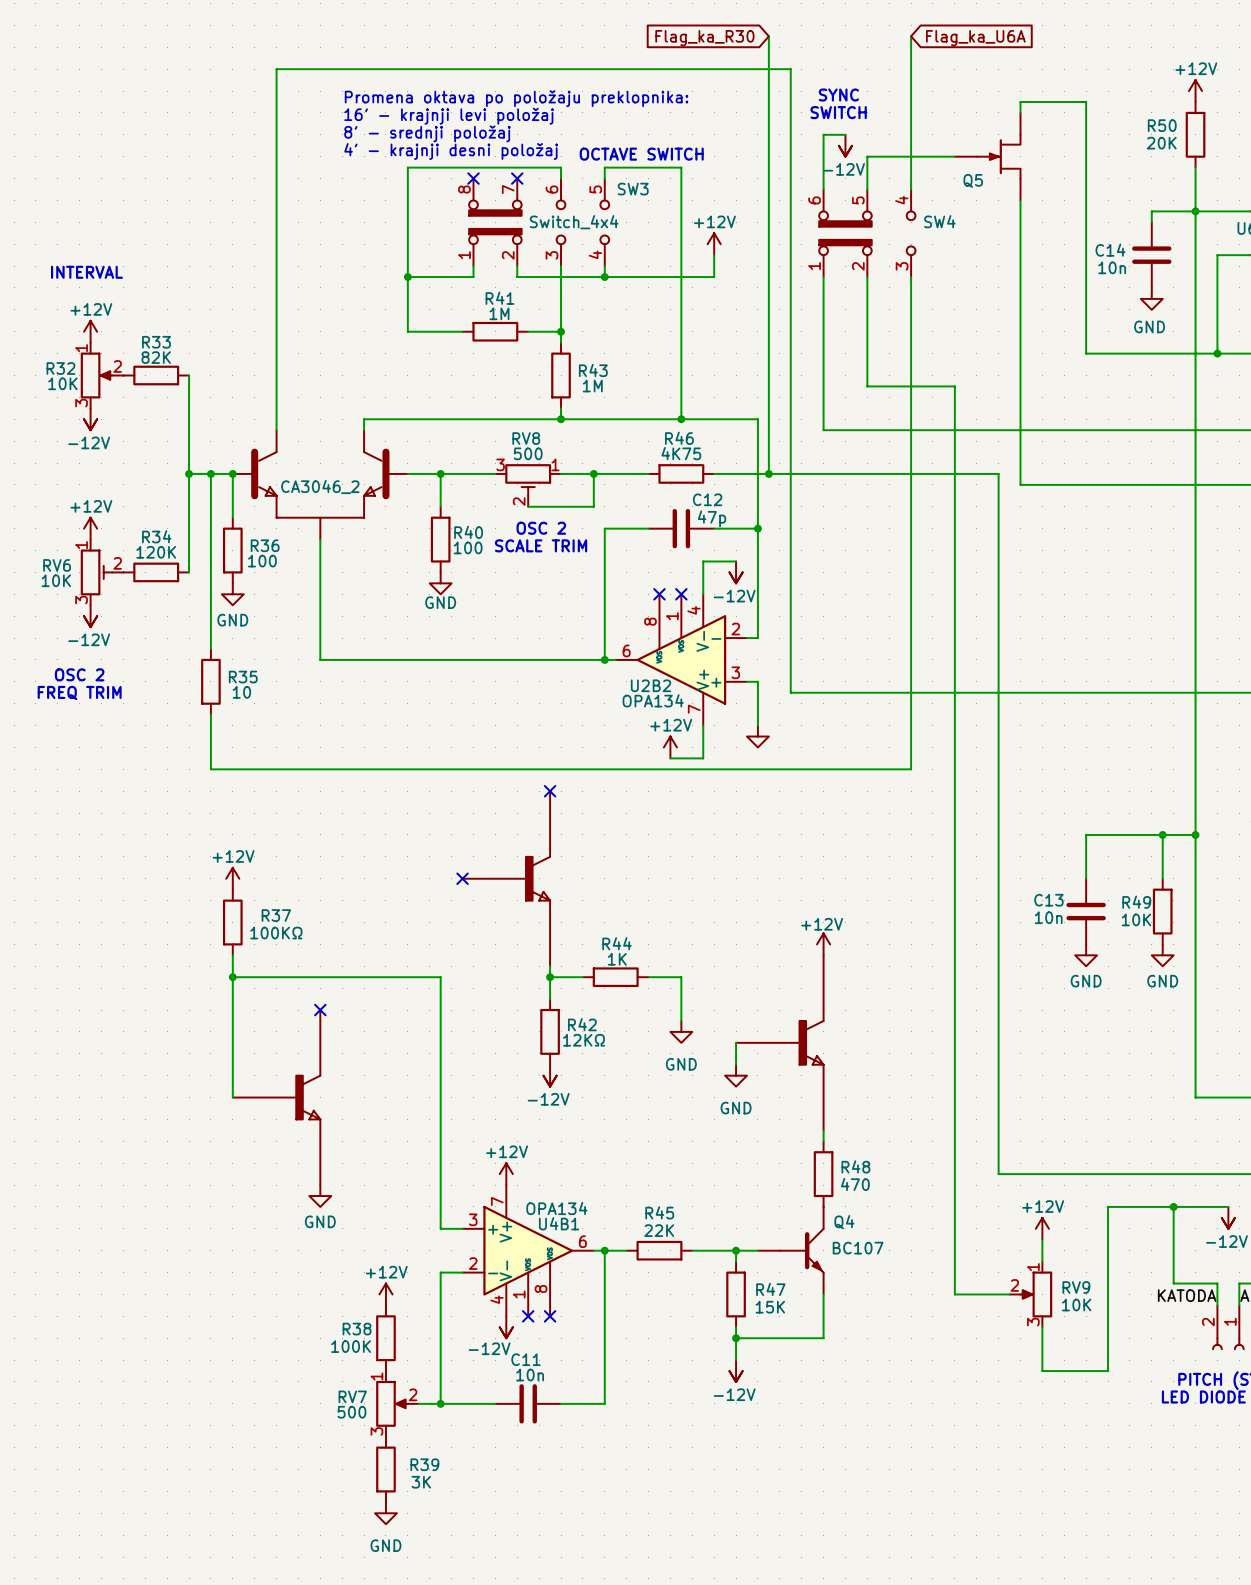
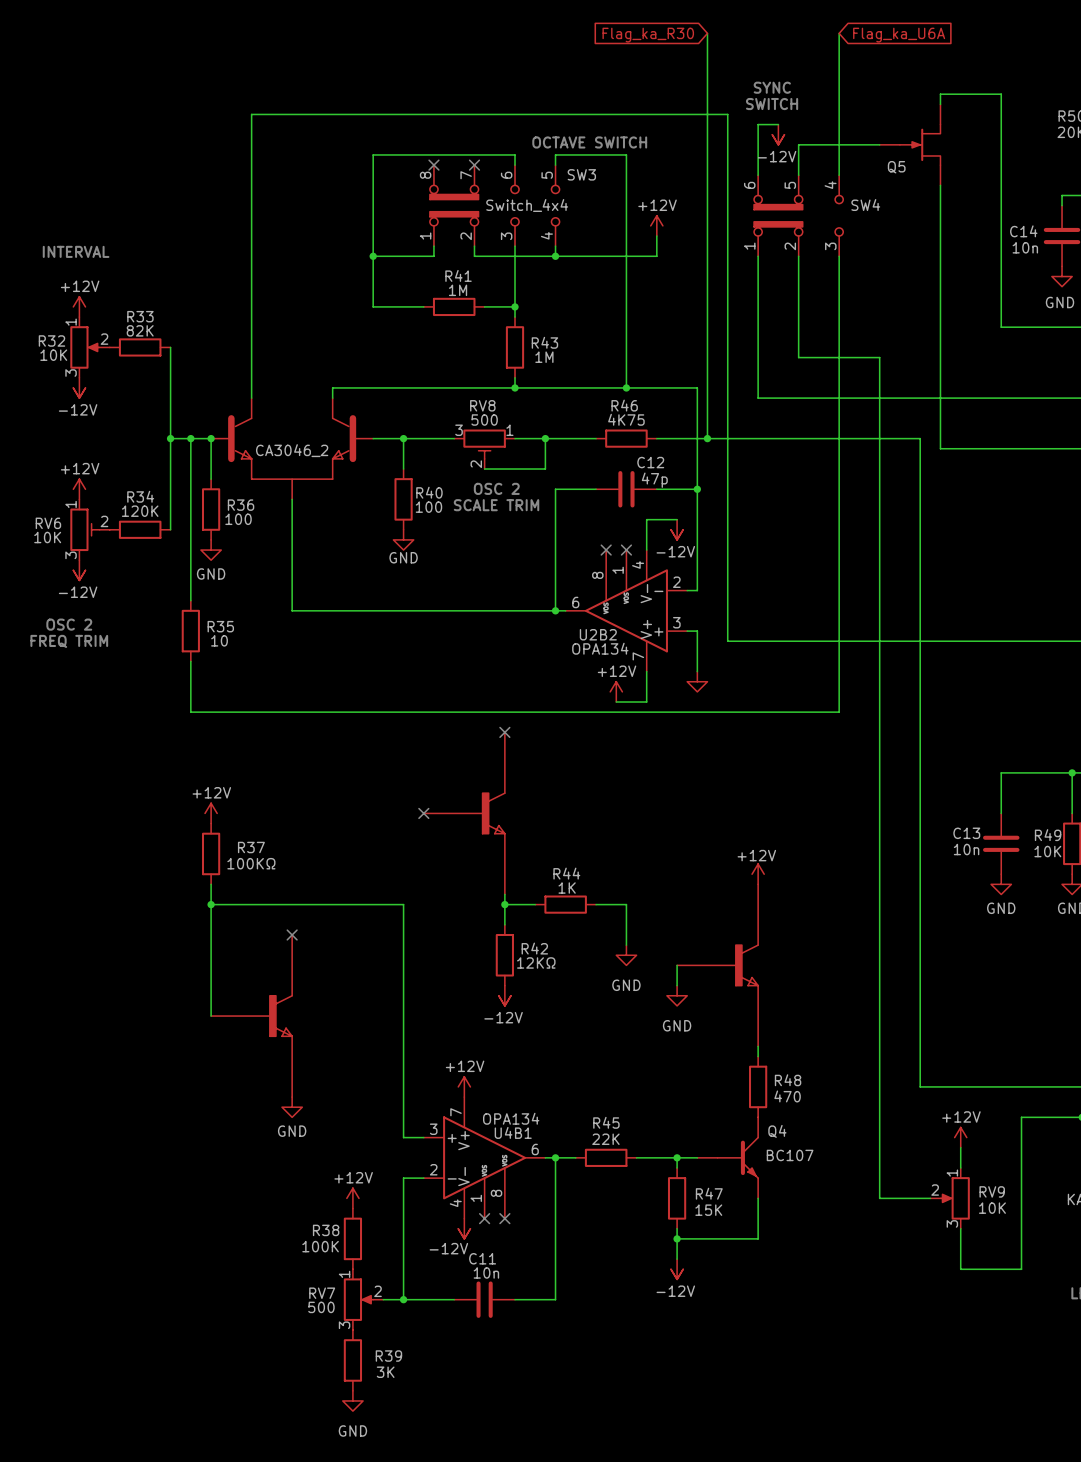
text: Promena oktava po položaju preklopnika: (516, 98) -> none
text: 16' - krajnji levi položaj (449, 116) -> none
wire: (276, 123) (276, 69) (790, 69) (790, 123) -> (251, 114) (727, 114)
text: 8' - srednji položaj (427, 133) -> none
text: 4' - krajnji desni položaj (451, 151) -> none

